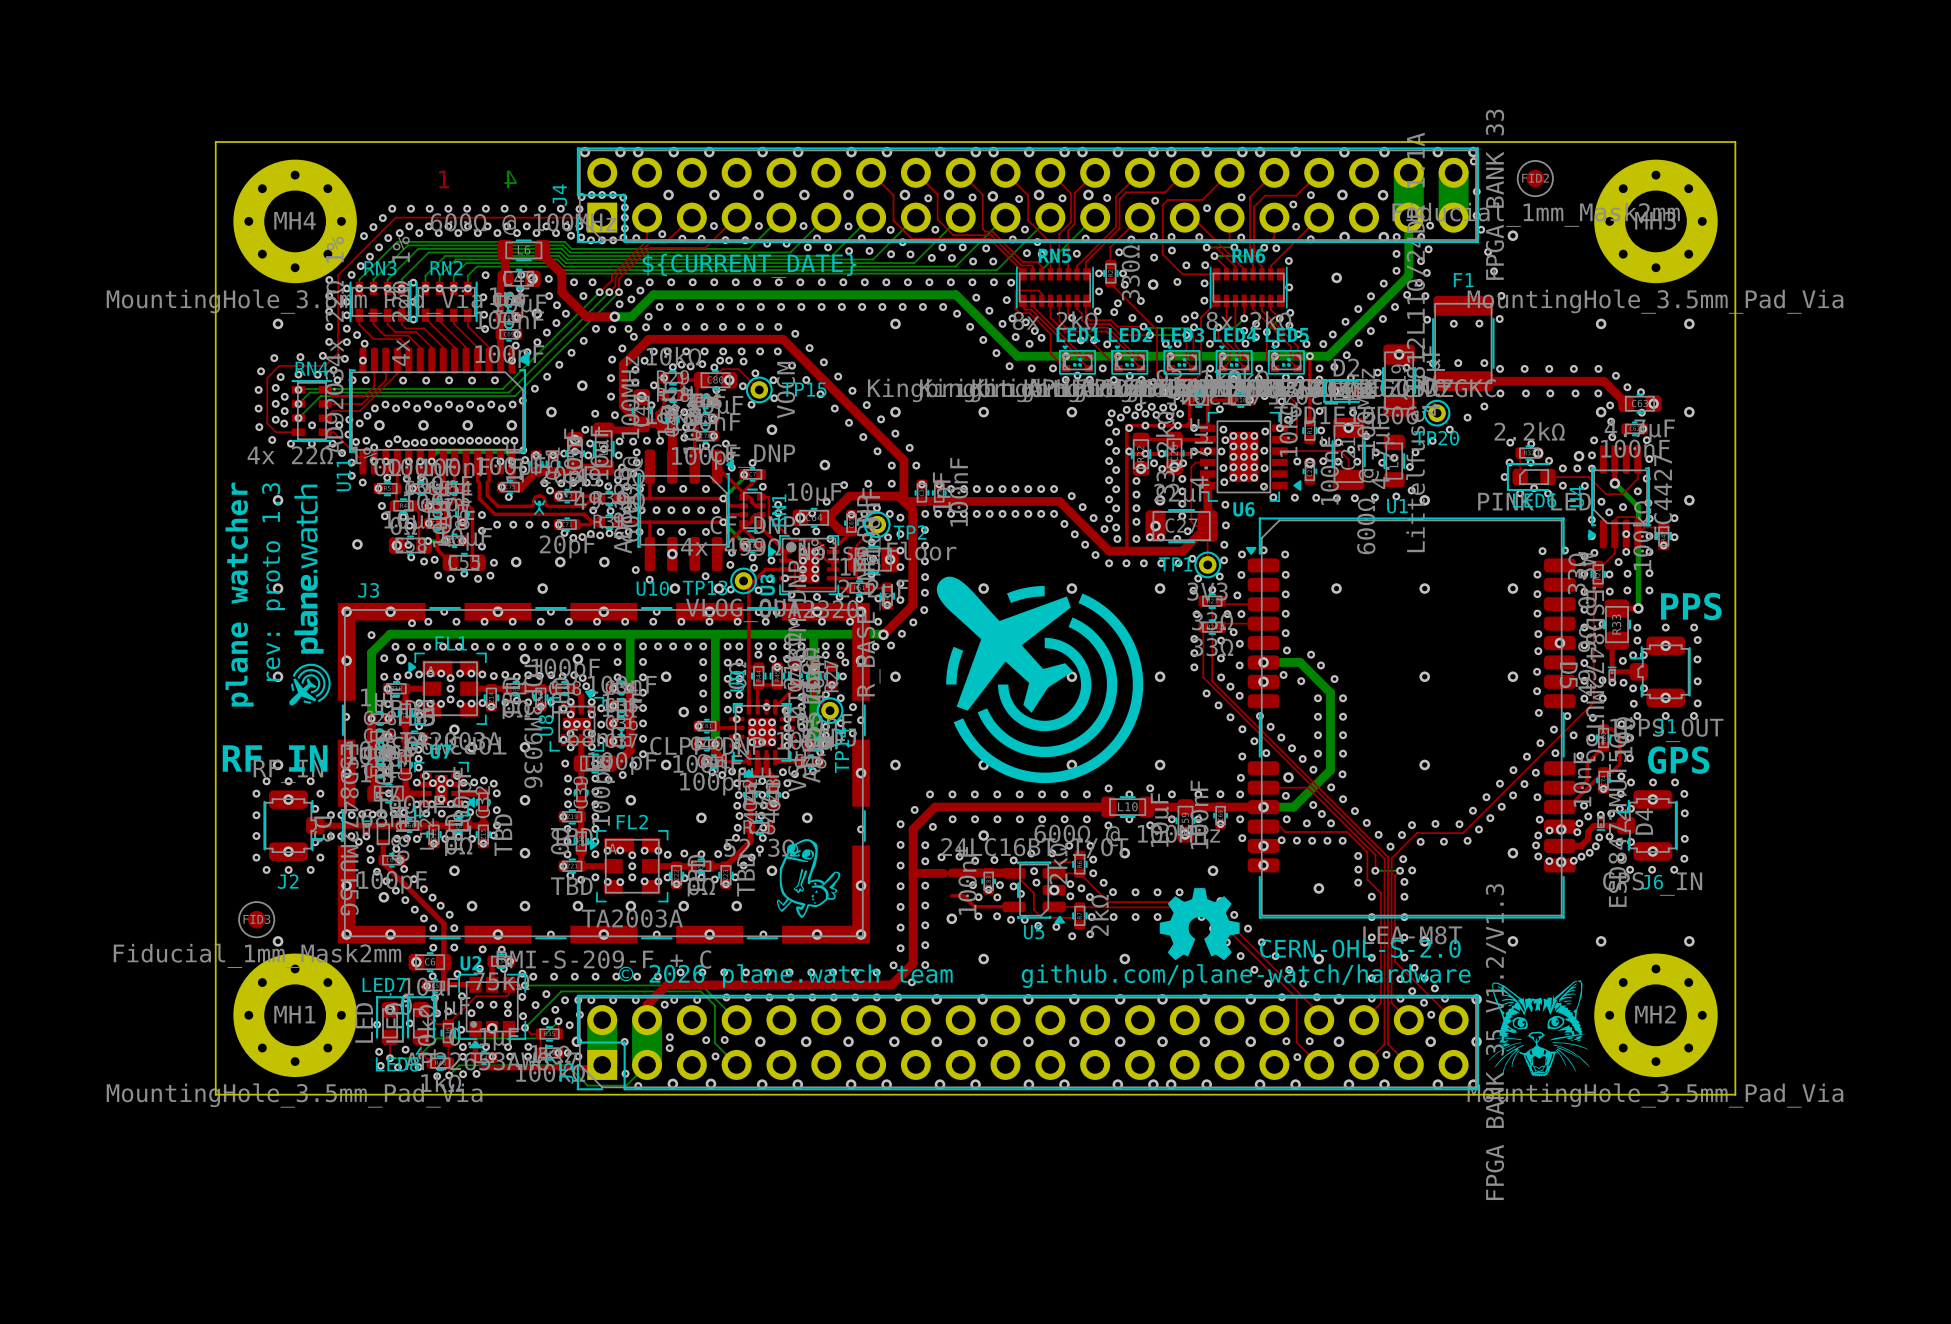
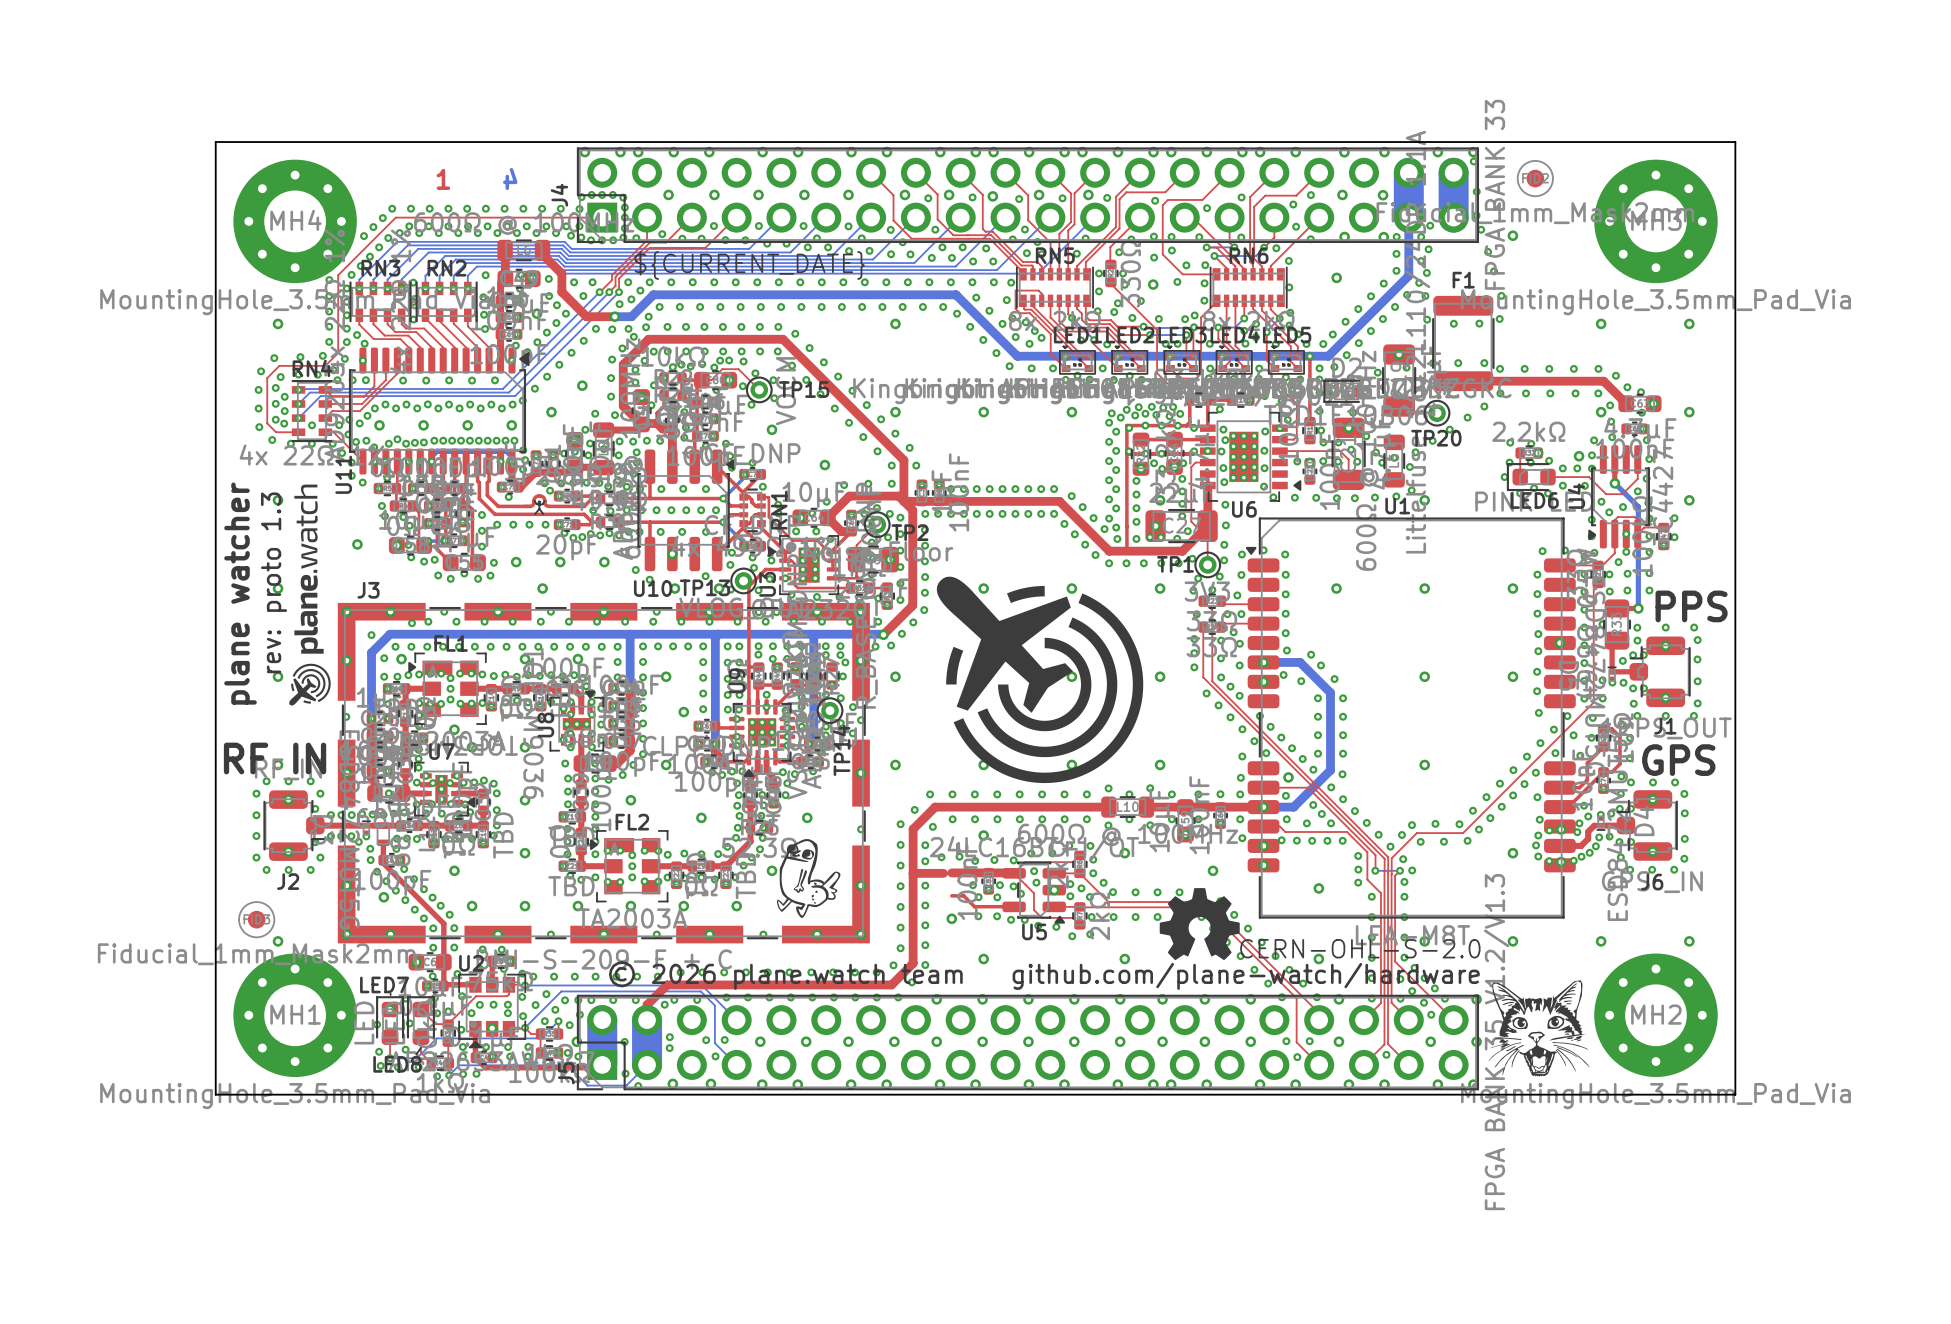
via position: (762, 781) -> (766, 694)

